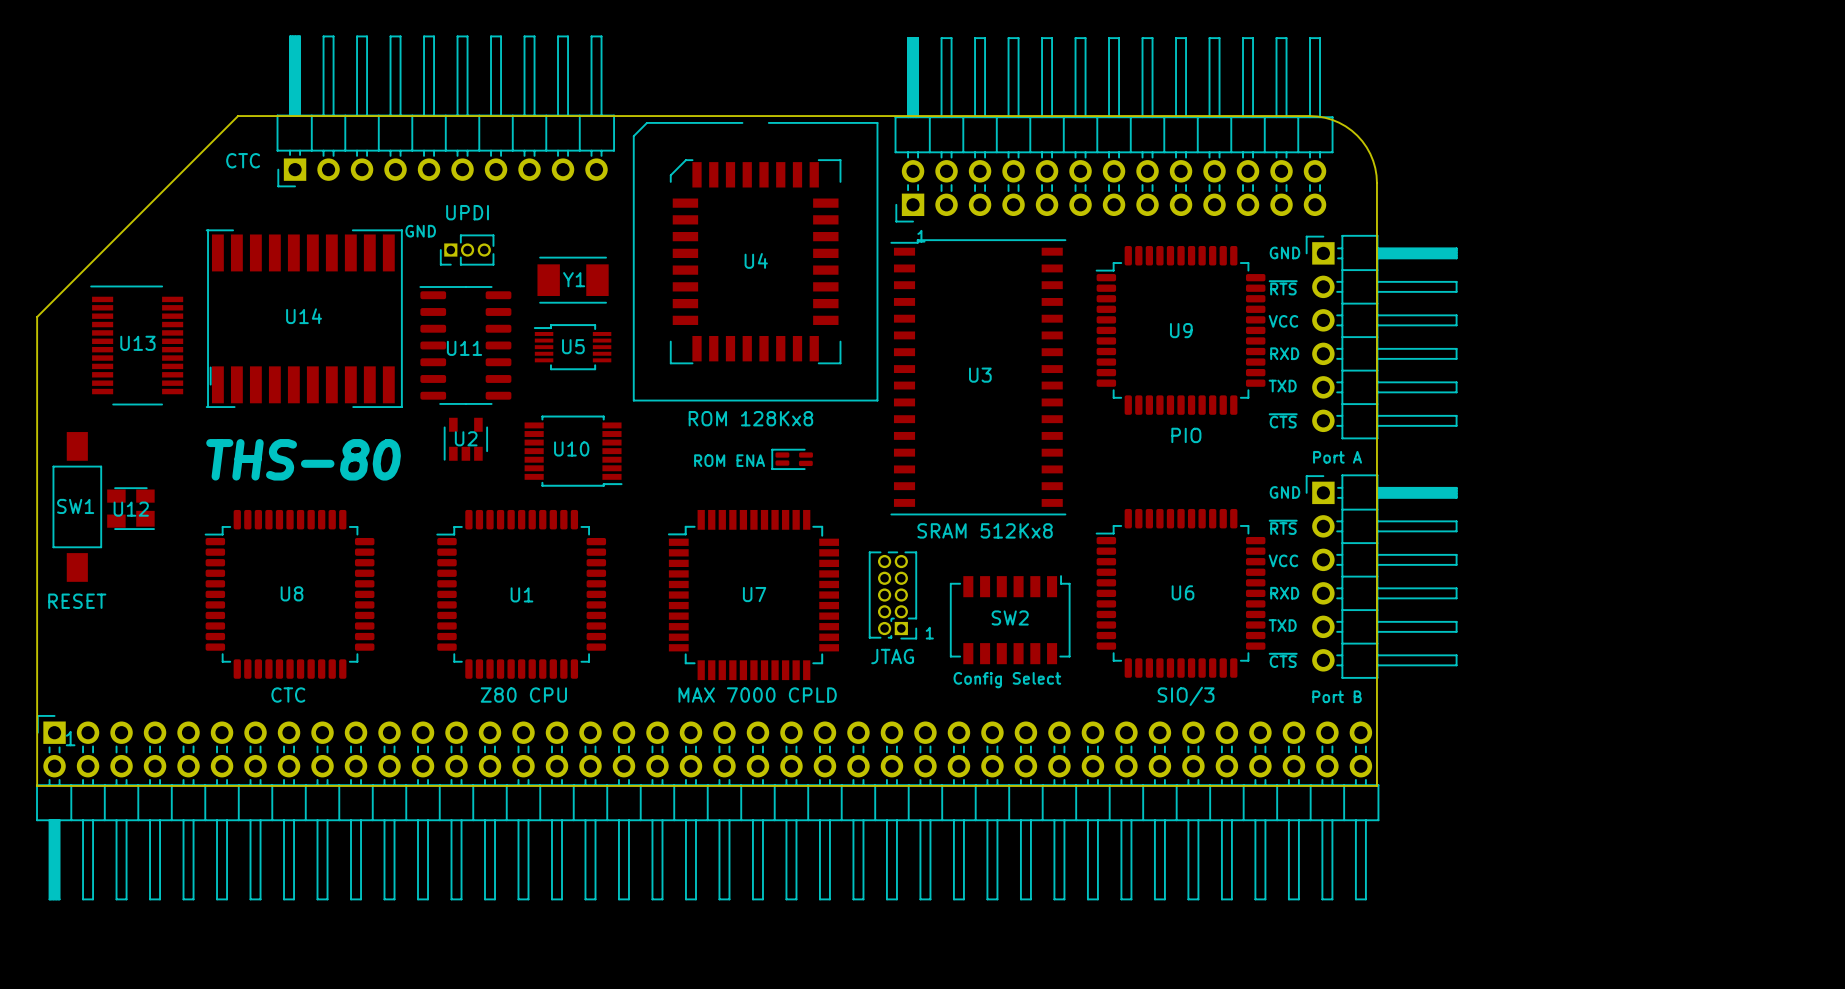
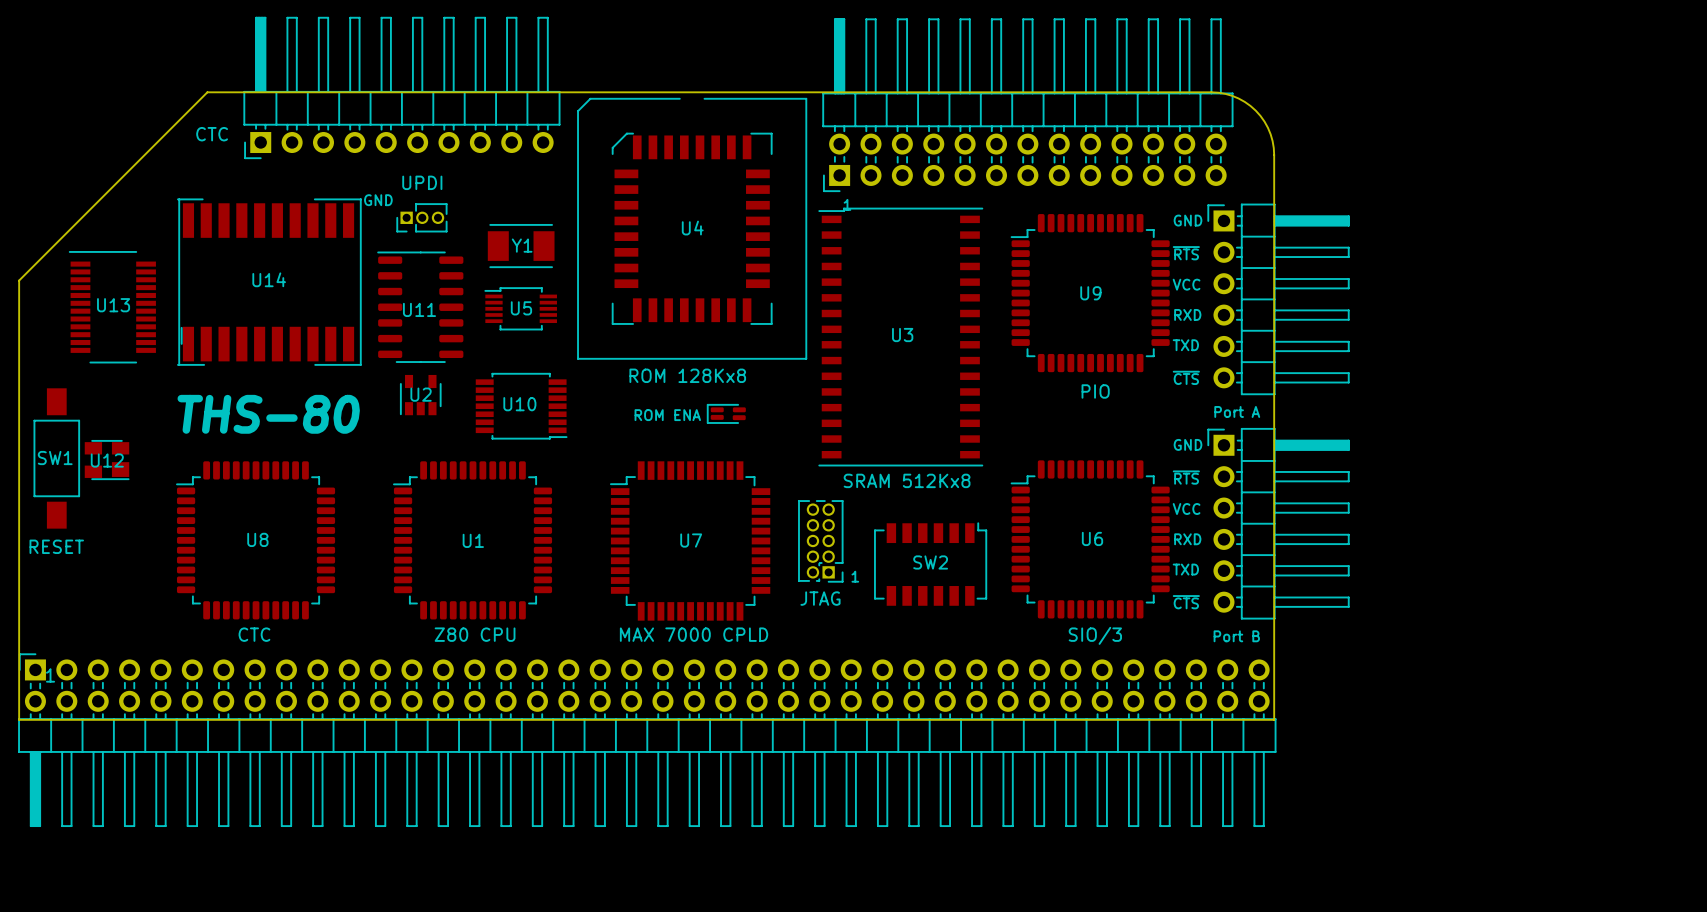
text: Config Select (1007, 680) -> none

